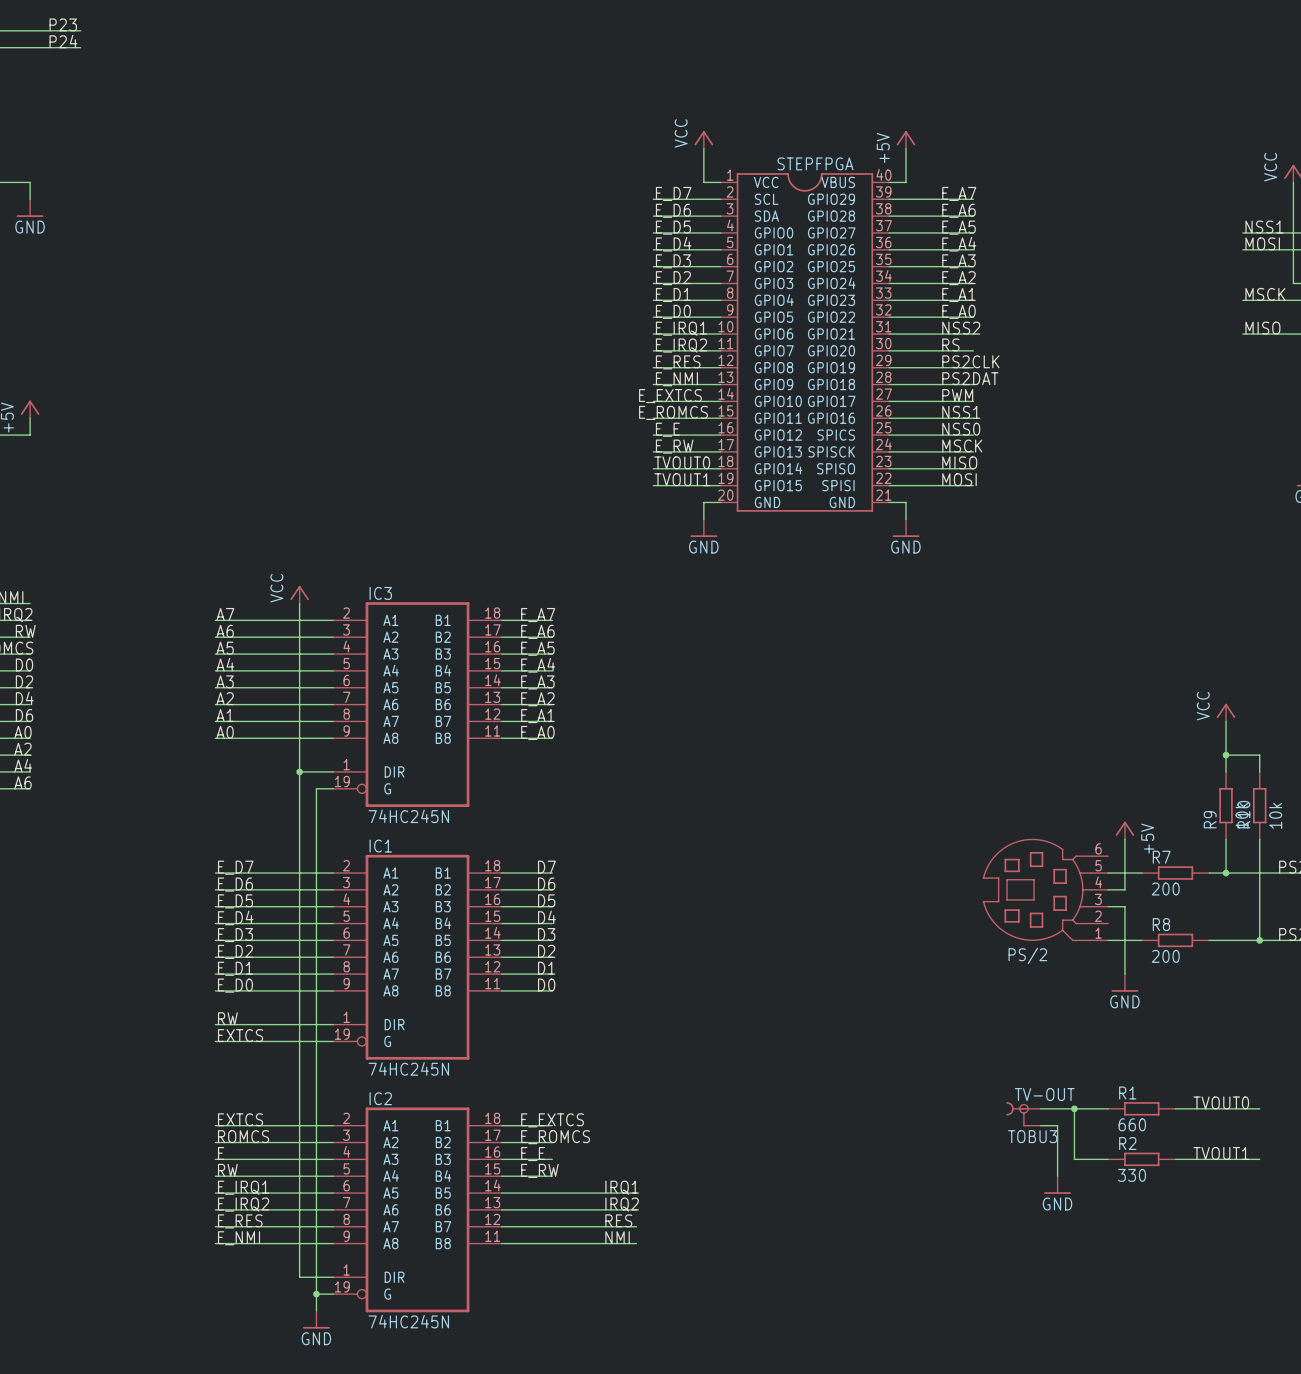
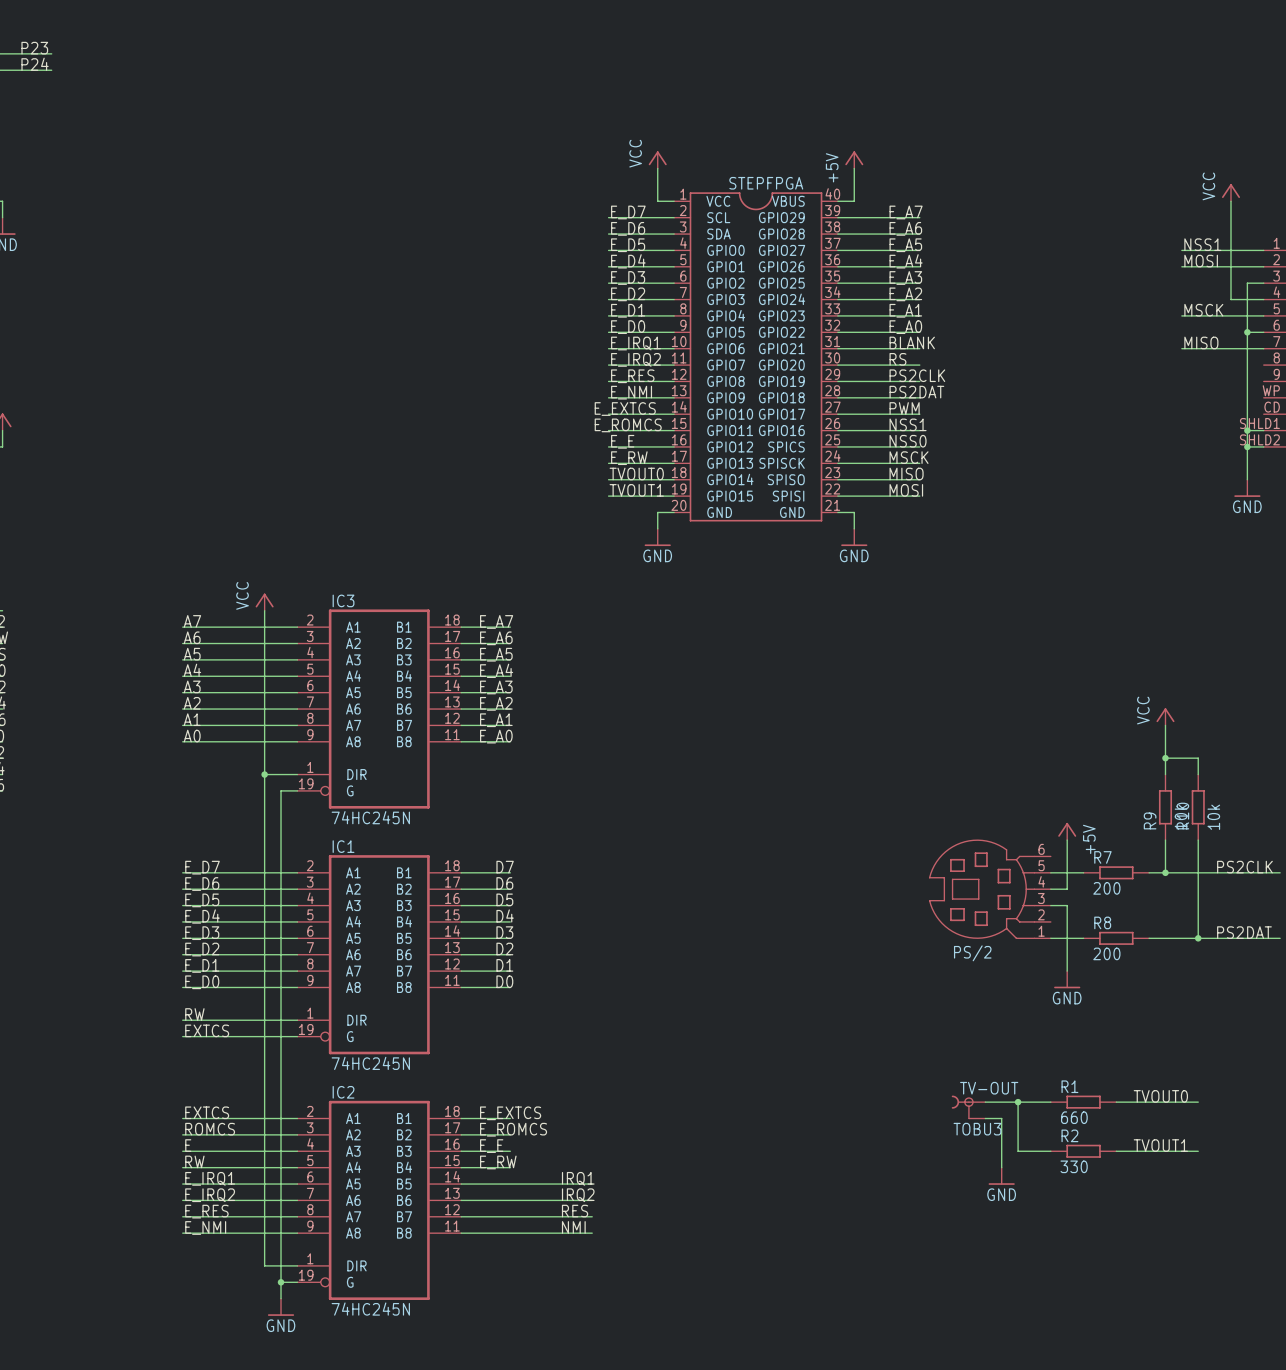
label: NSS2 (961, 328) -> BLANK (912, 342)

